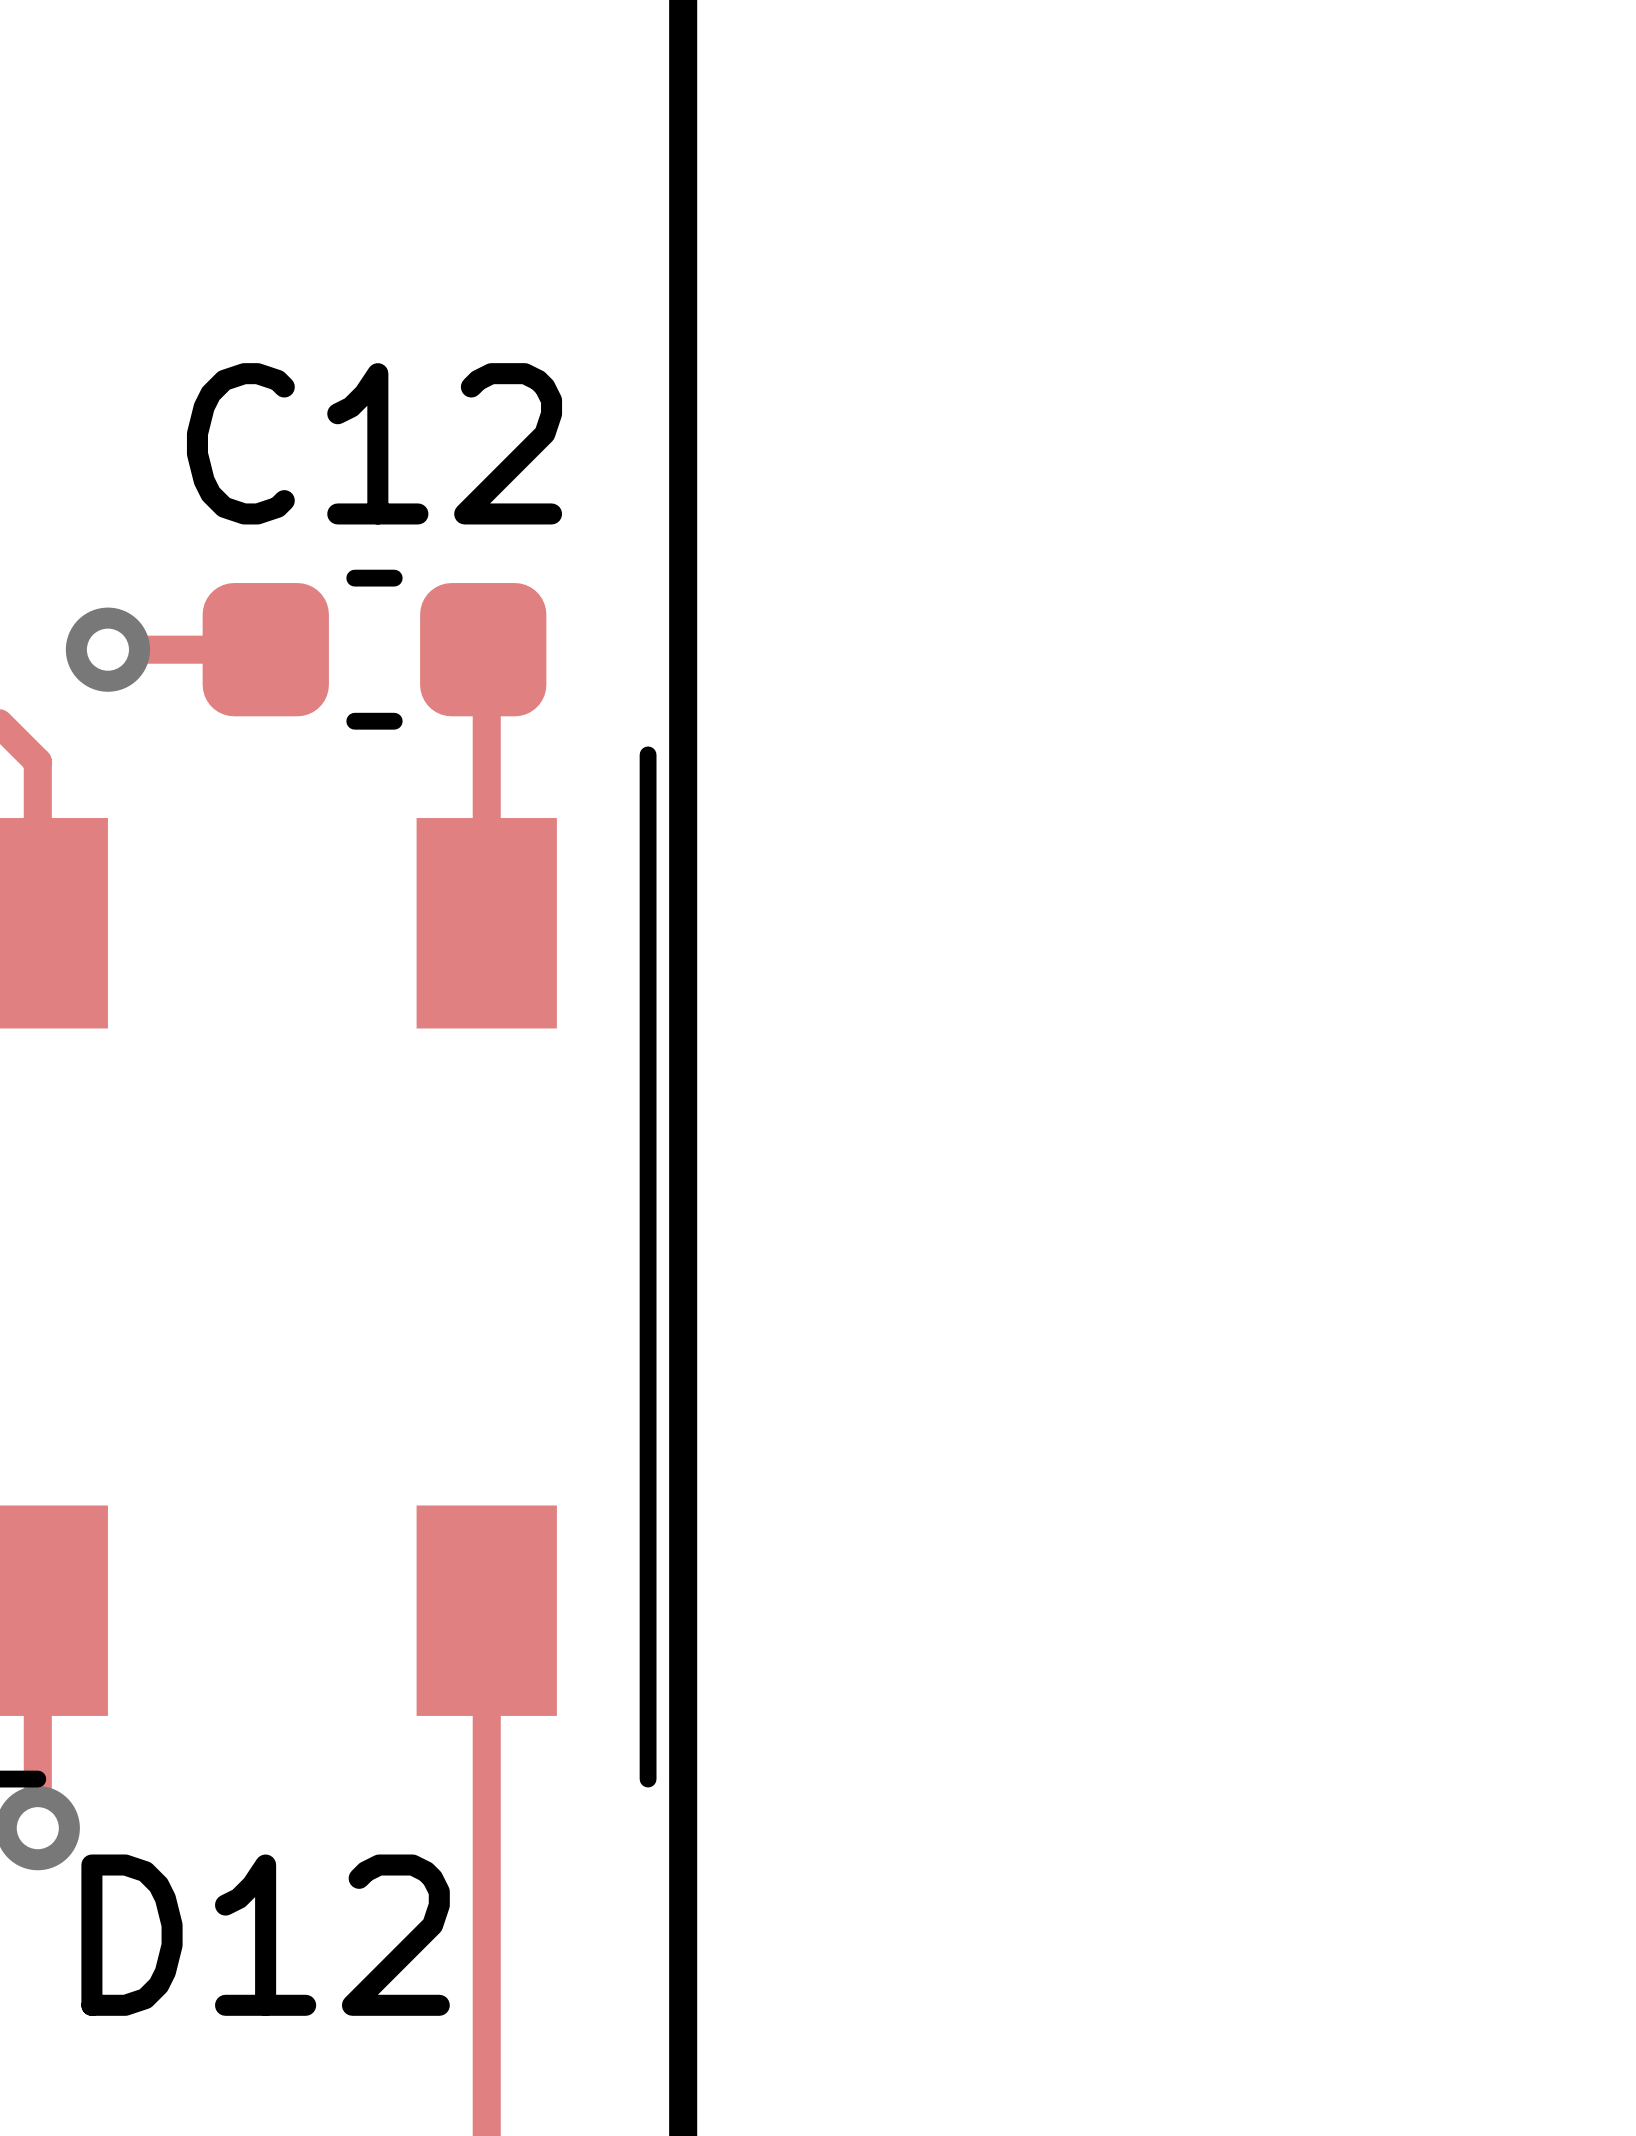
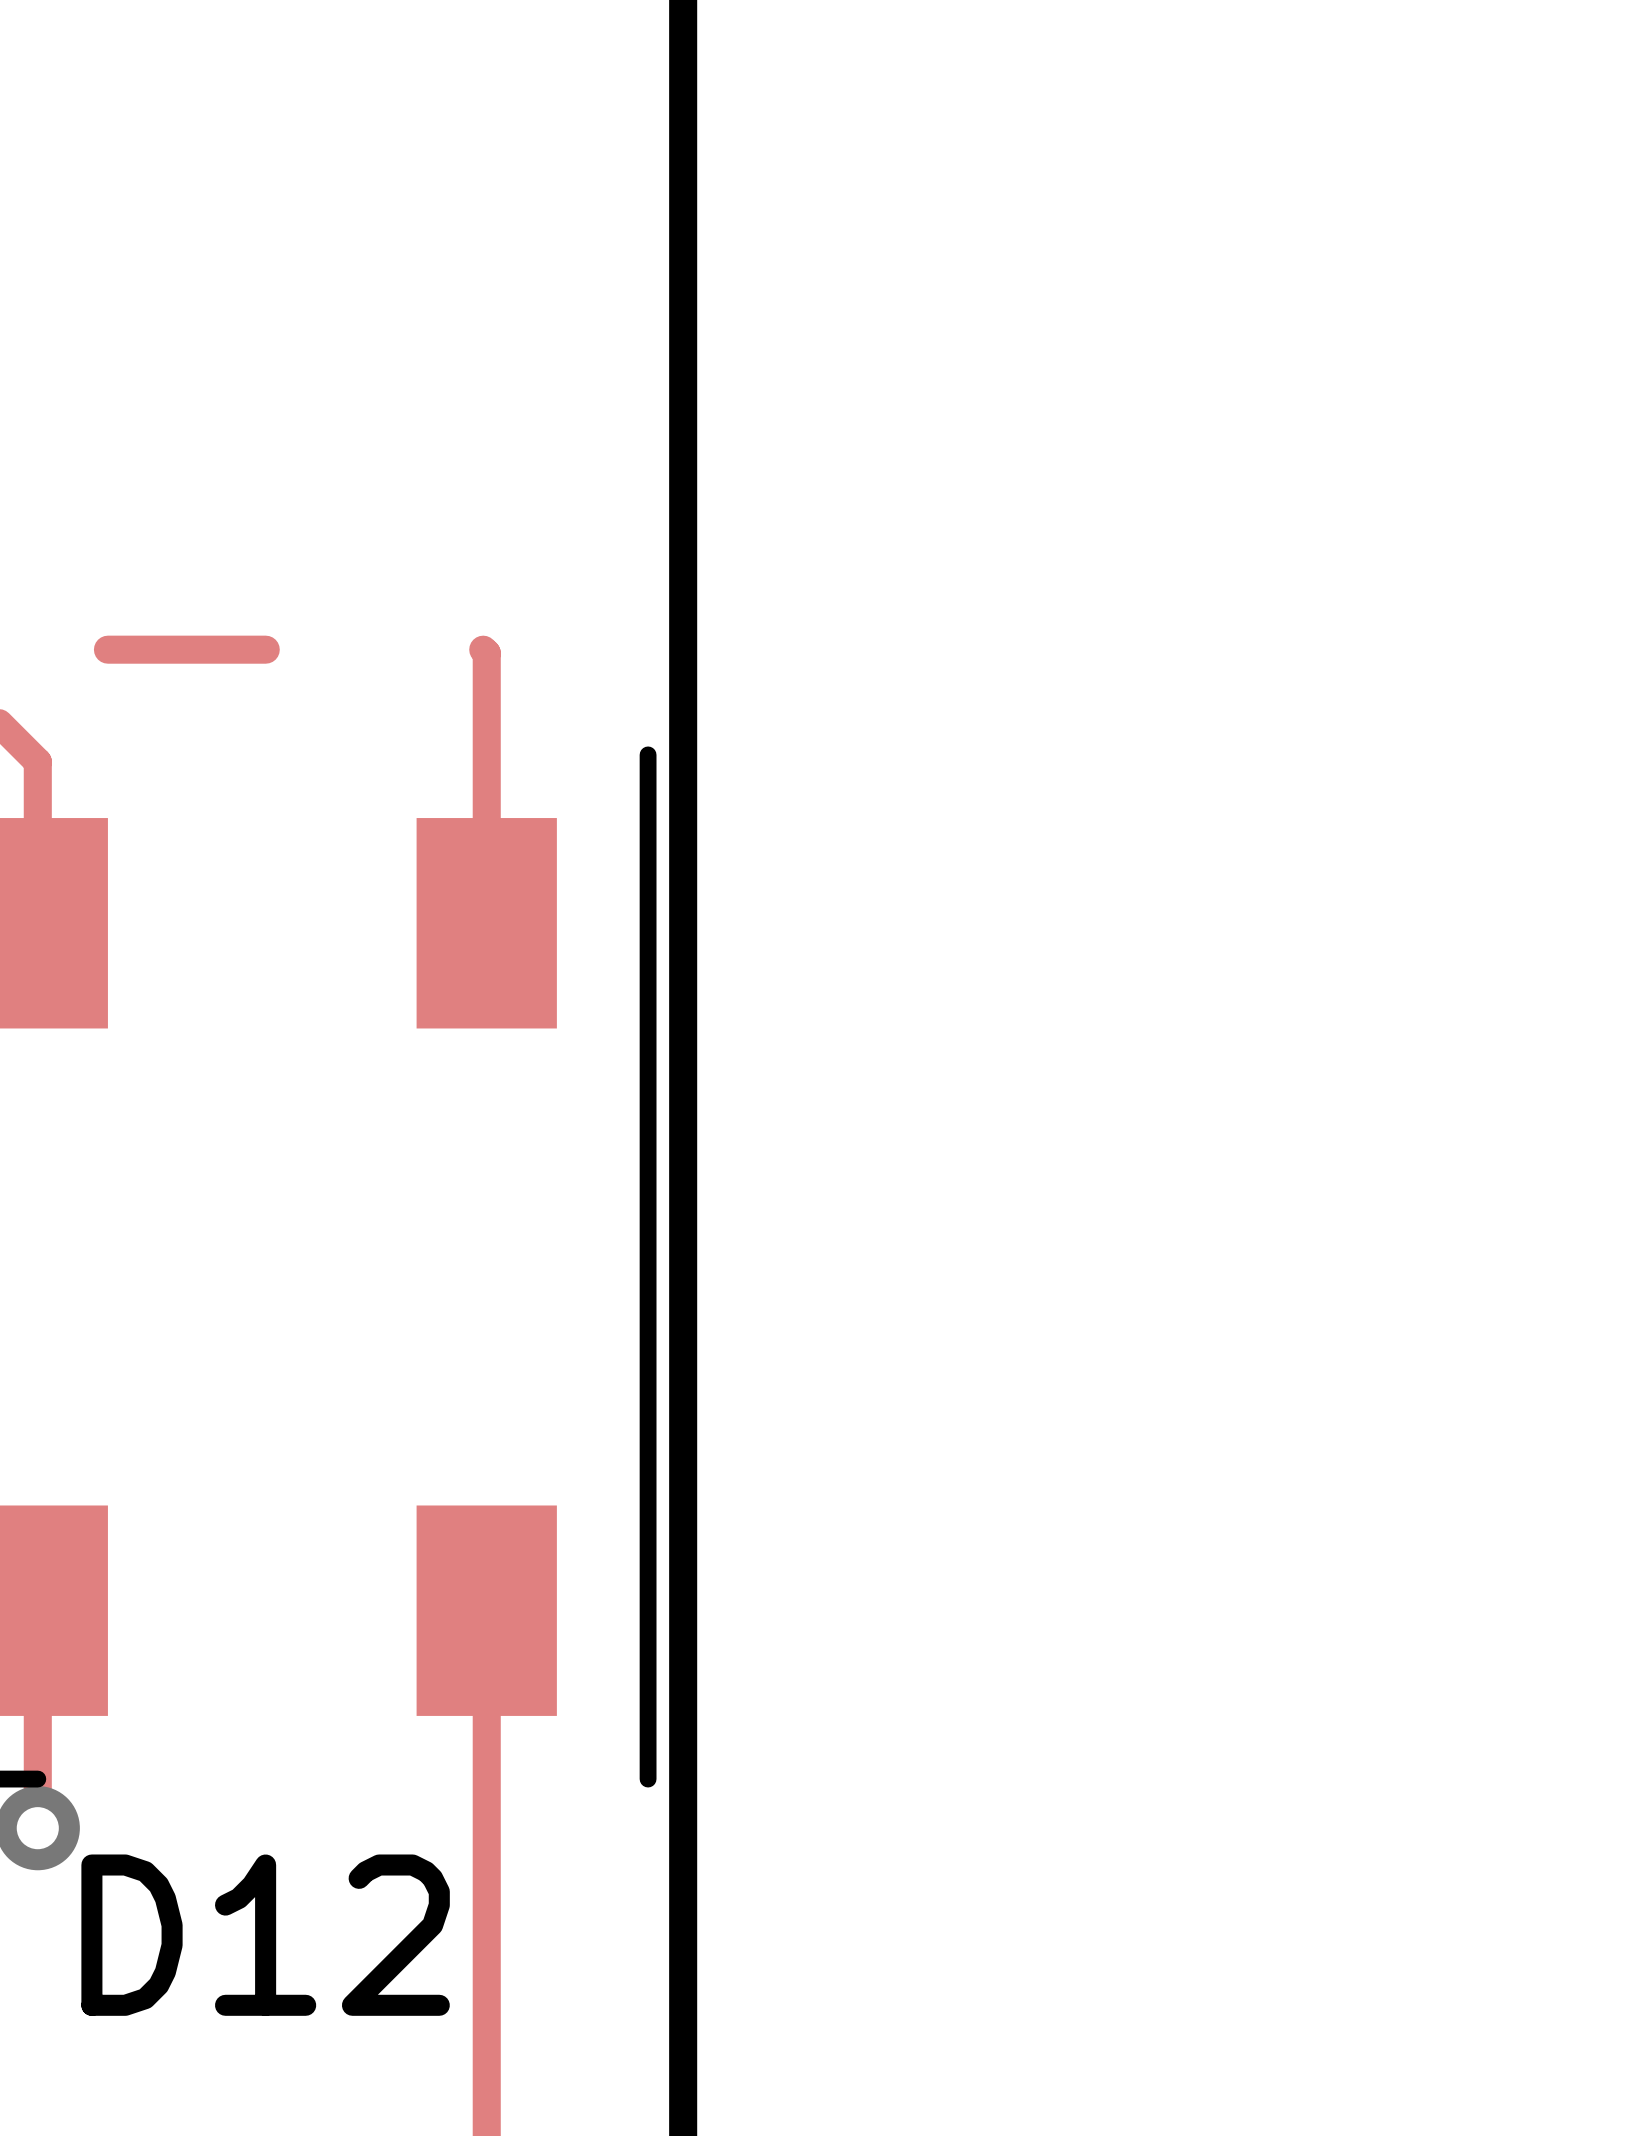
via: (107, 649) -> none
C12: (374, 649) -> none

